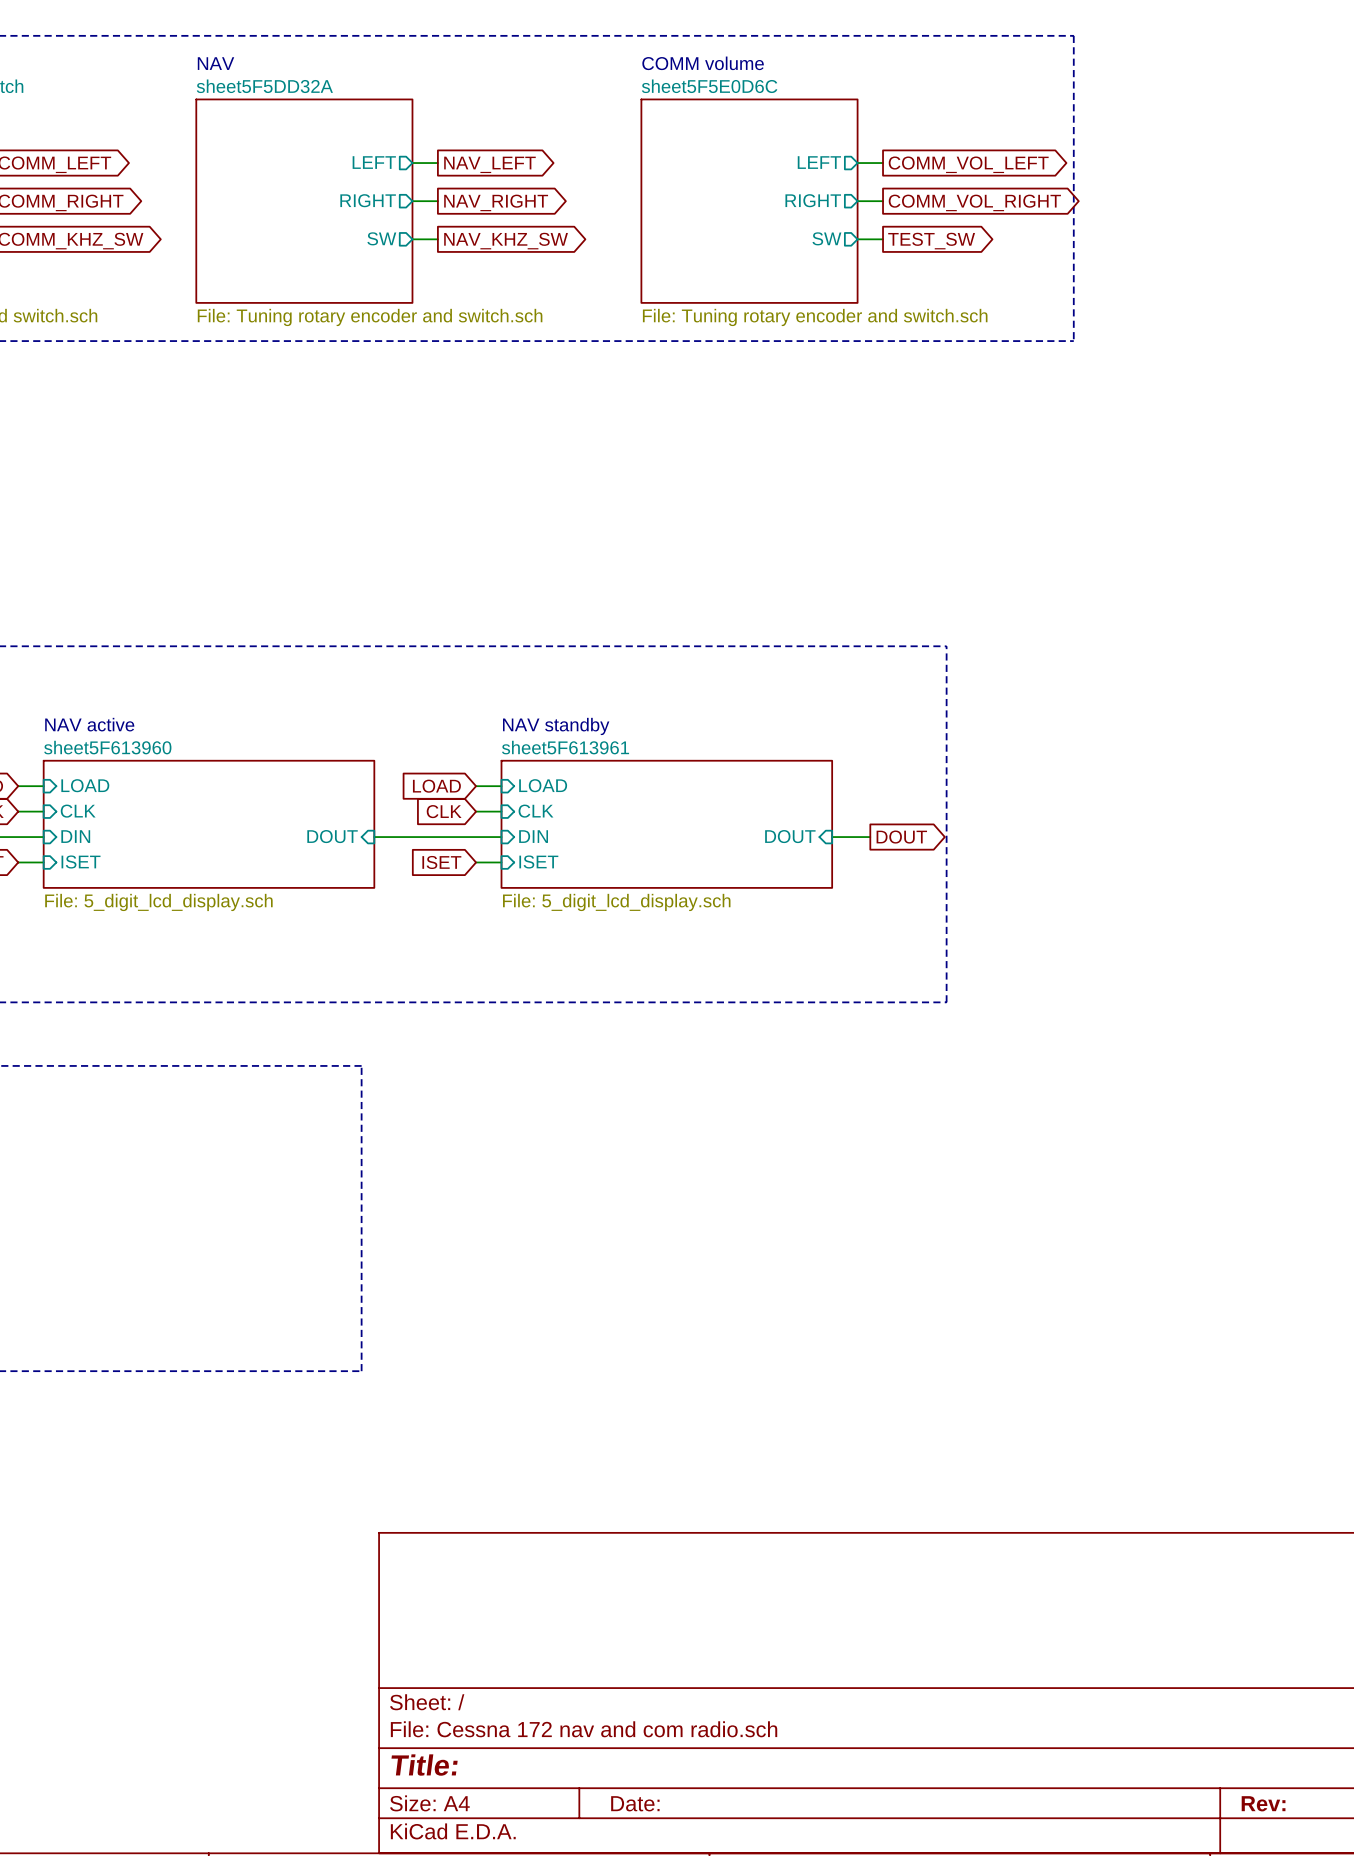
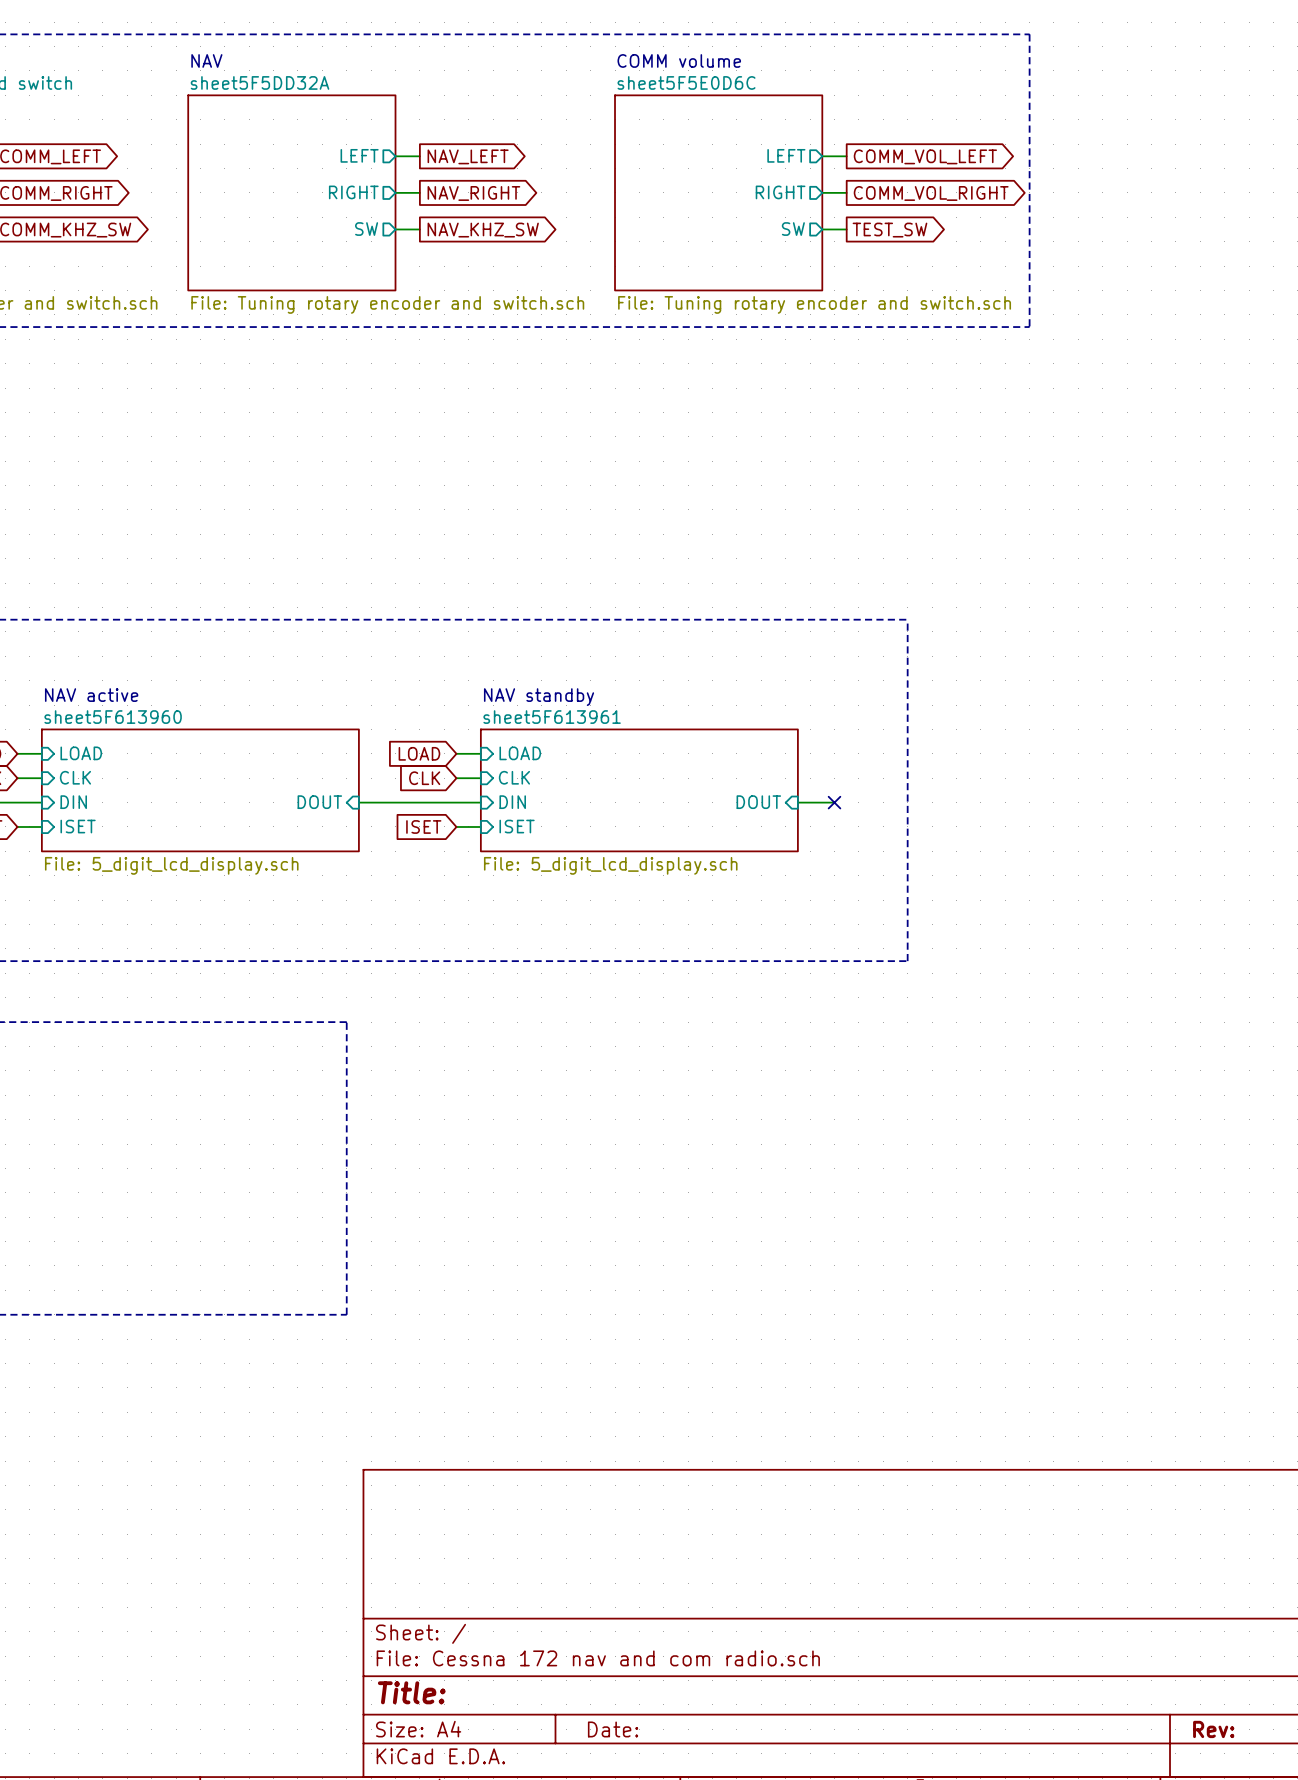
no-connect mark: none -> (834, 802)
global label: DOUT (901, 837) -> none

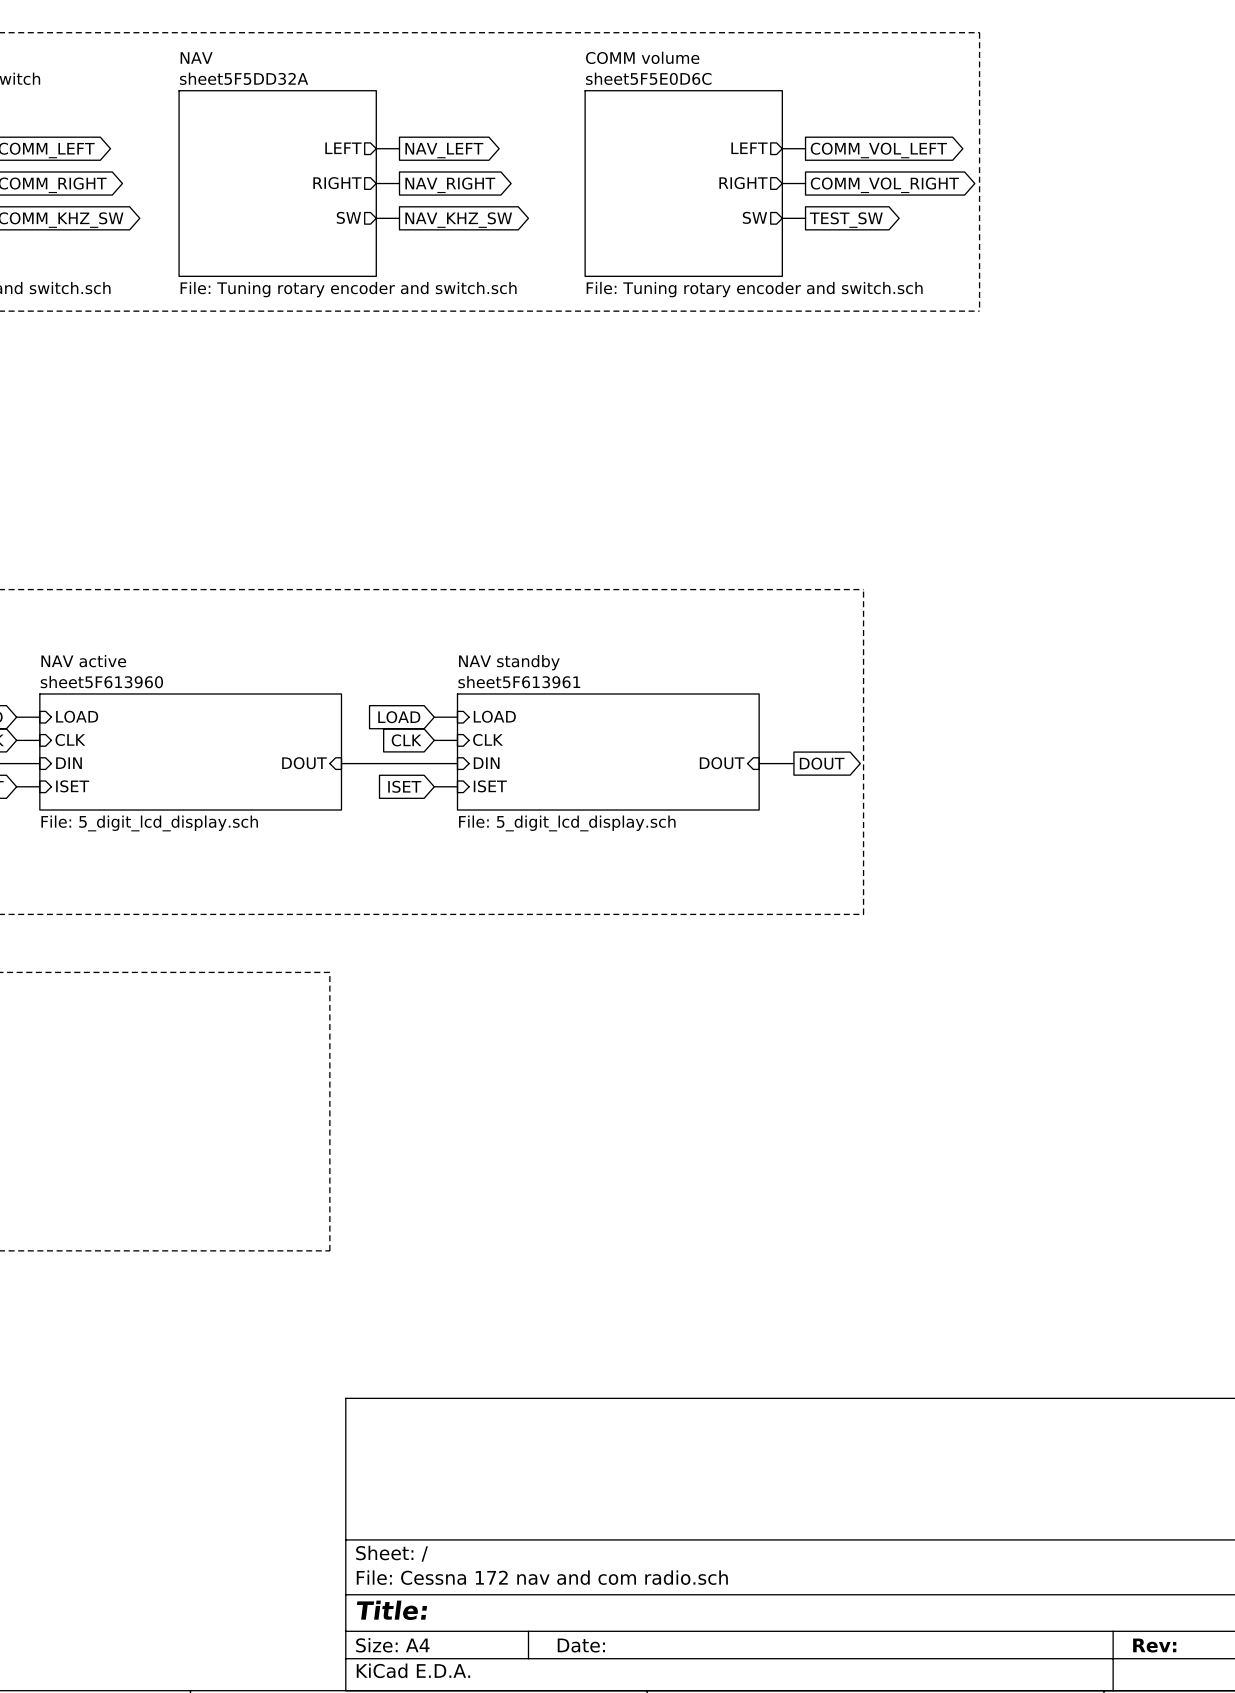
no-connect mark: (834, 802) -> none
global label: none -> DOUT (822, 763)

